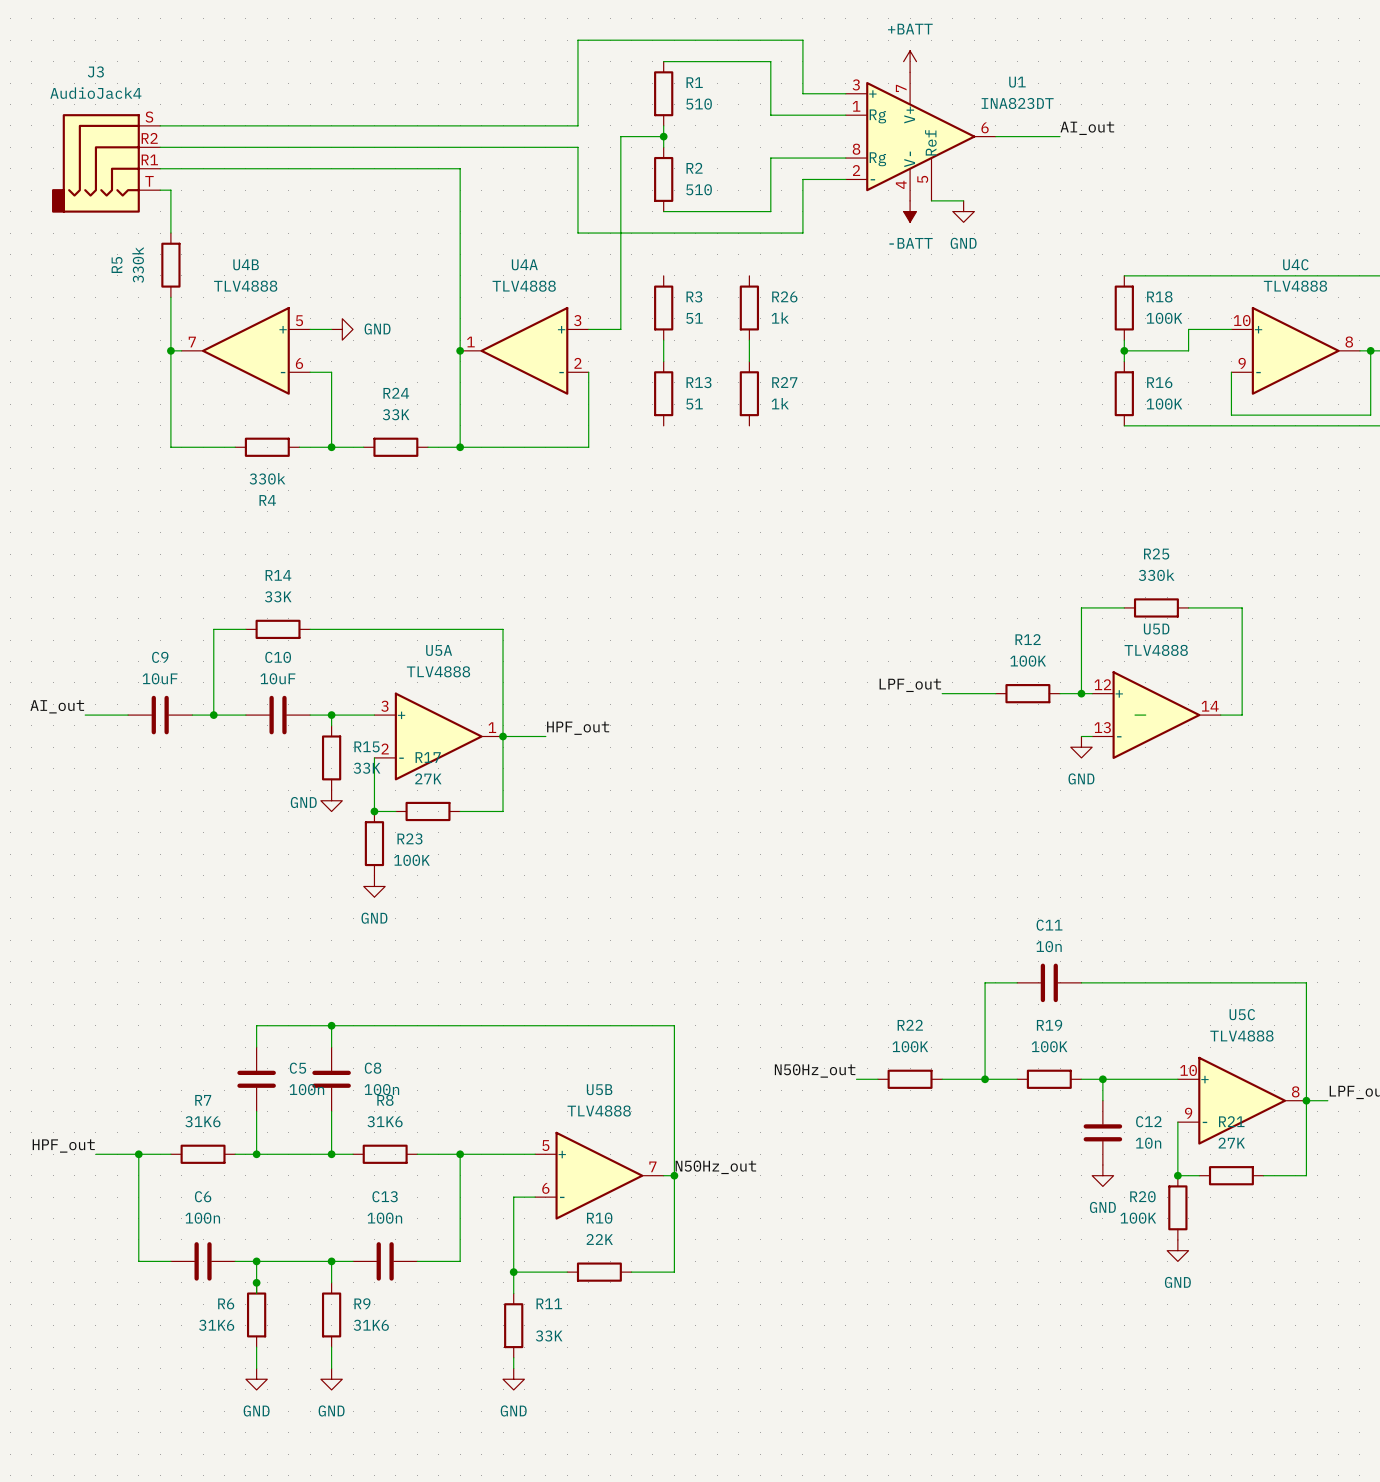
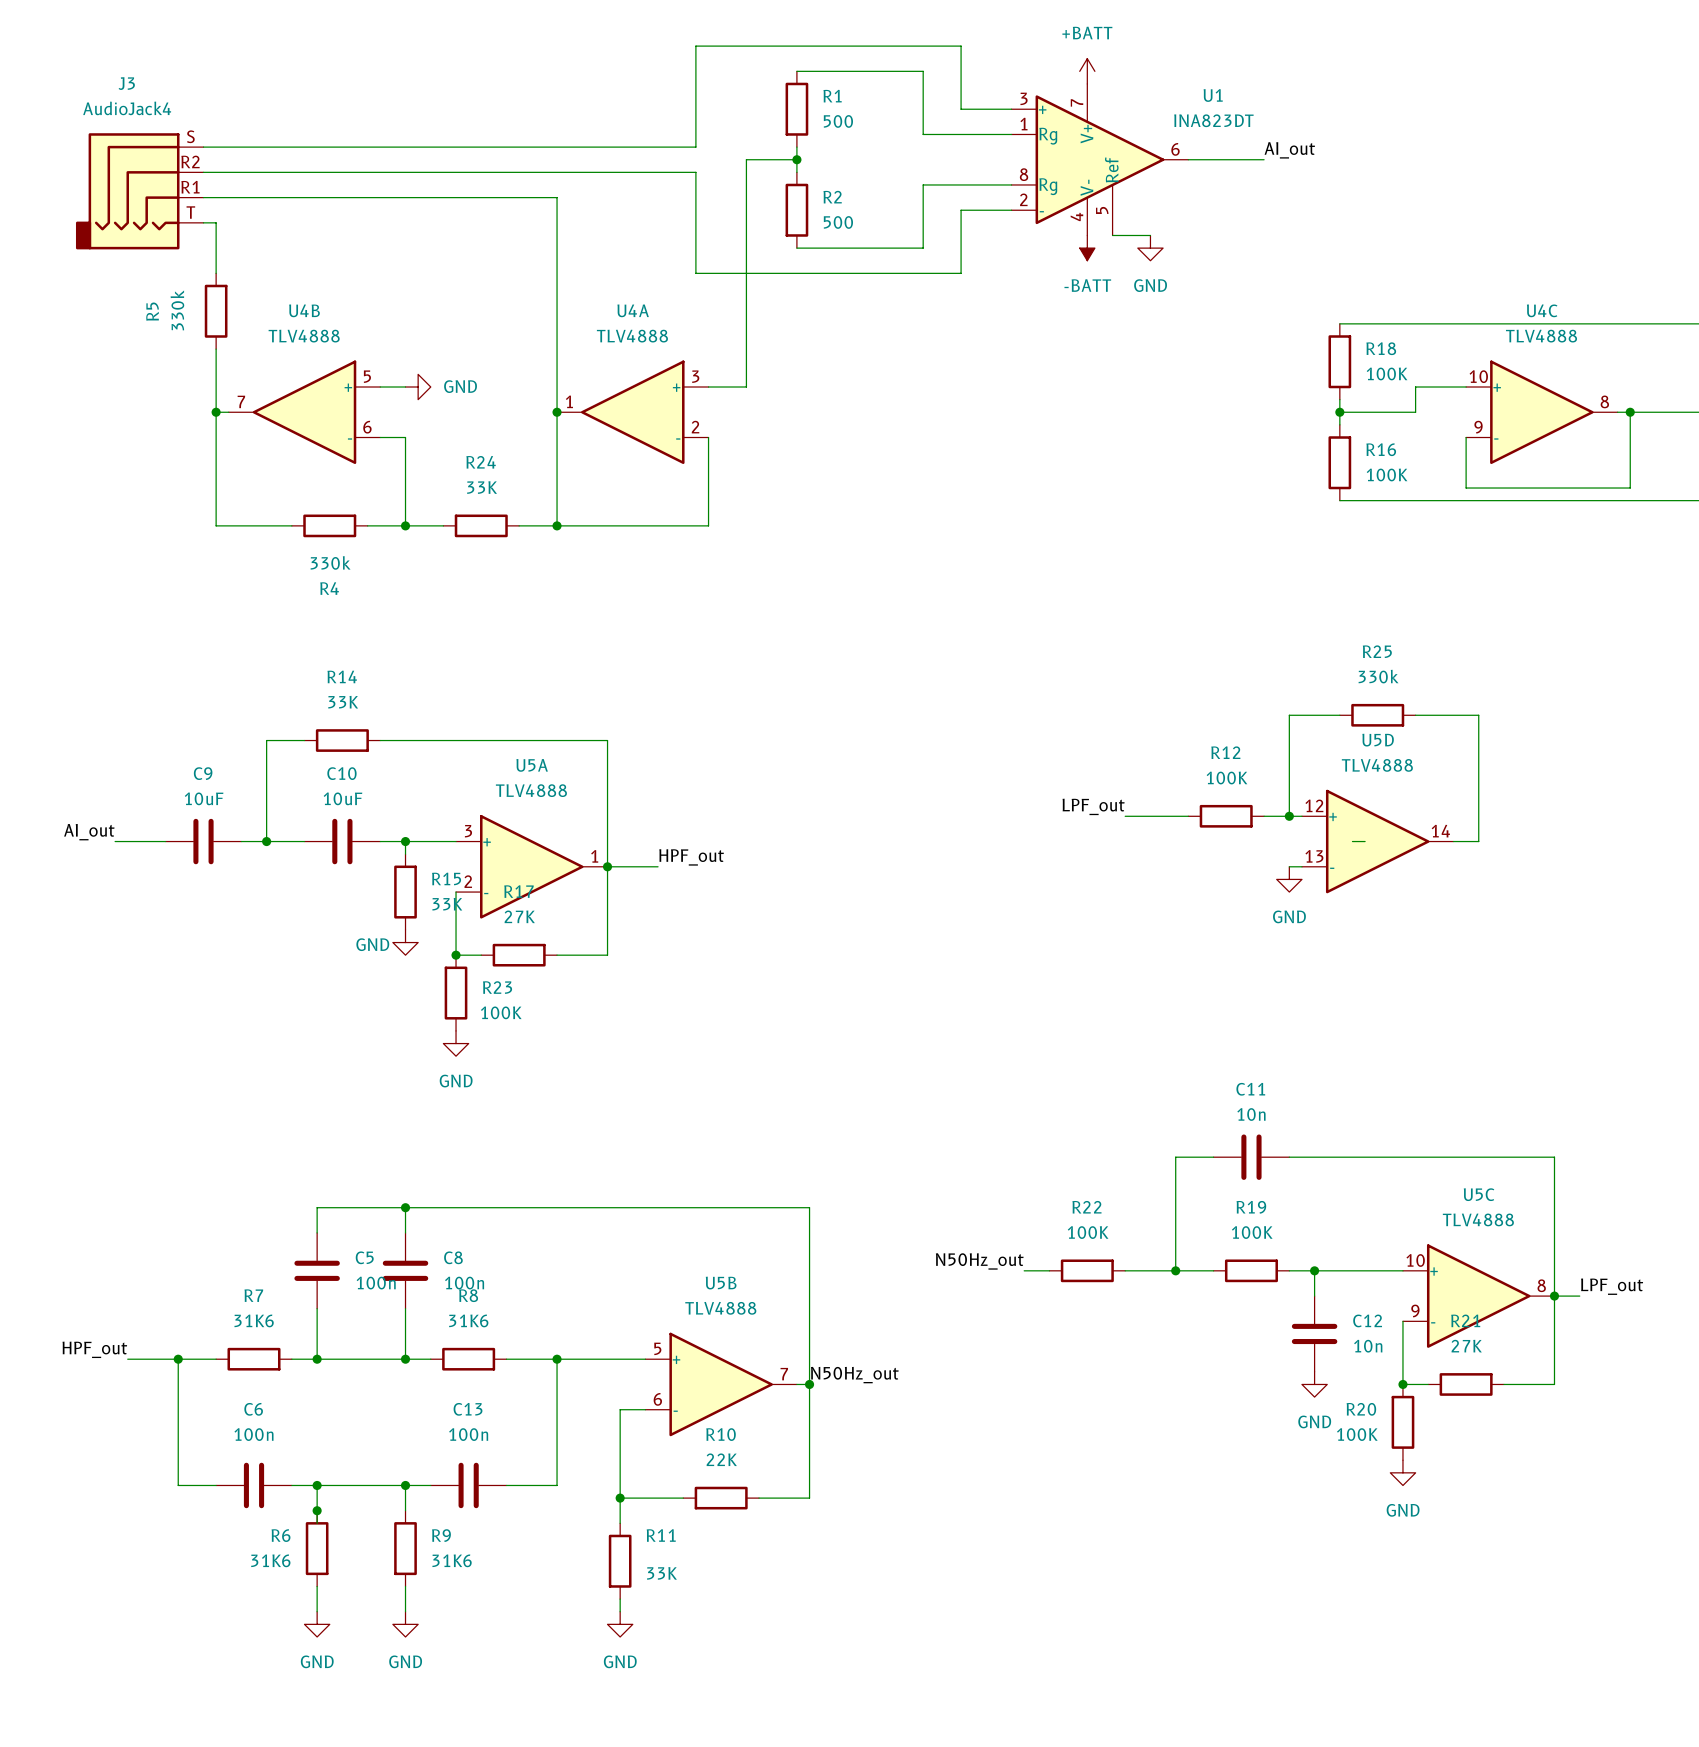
R1 value: 510 (699, 104) -> 500 (838, 121)
R2 value: 510 (699, 189) -> 500 (838, 222)
R3: 51 (663, 308) -> none
R26: 1k (749, 308) -> none
wire: (663, 340) (663, 361) -> none
wire: (749, 340) (749, 361) -> none
R13: 51 (663, 393) -> none
R27: 1k (749, 393) -> none

